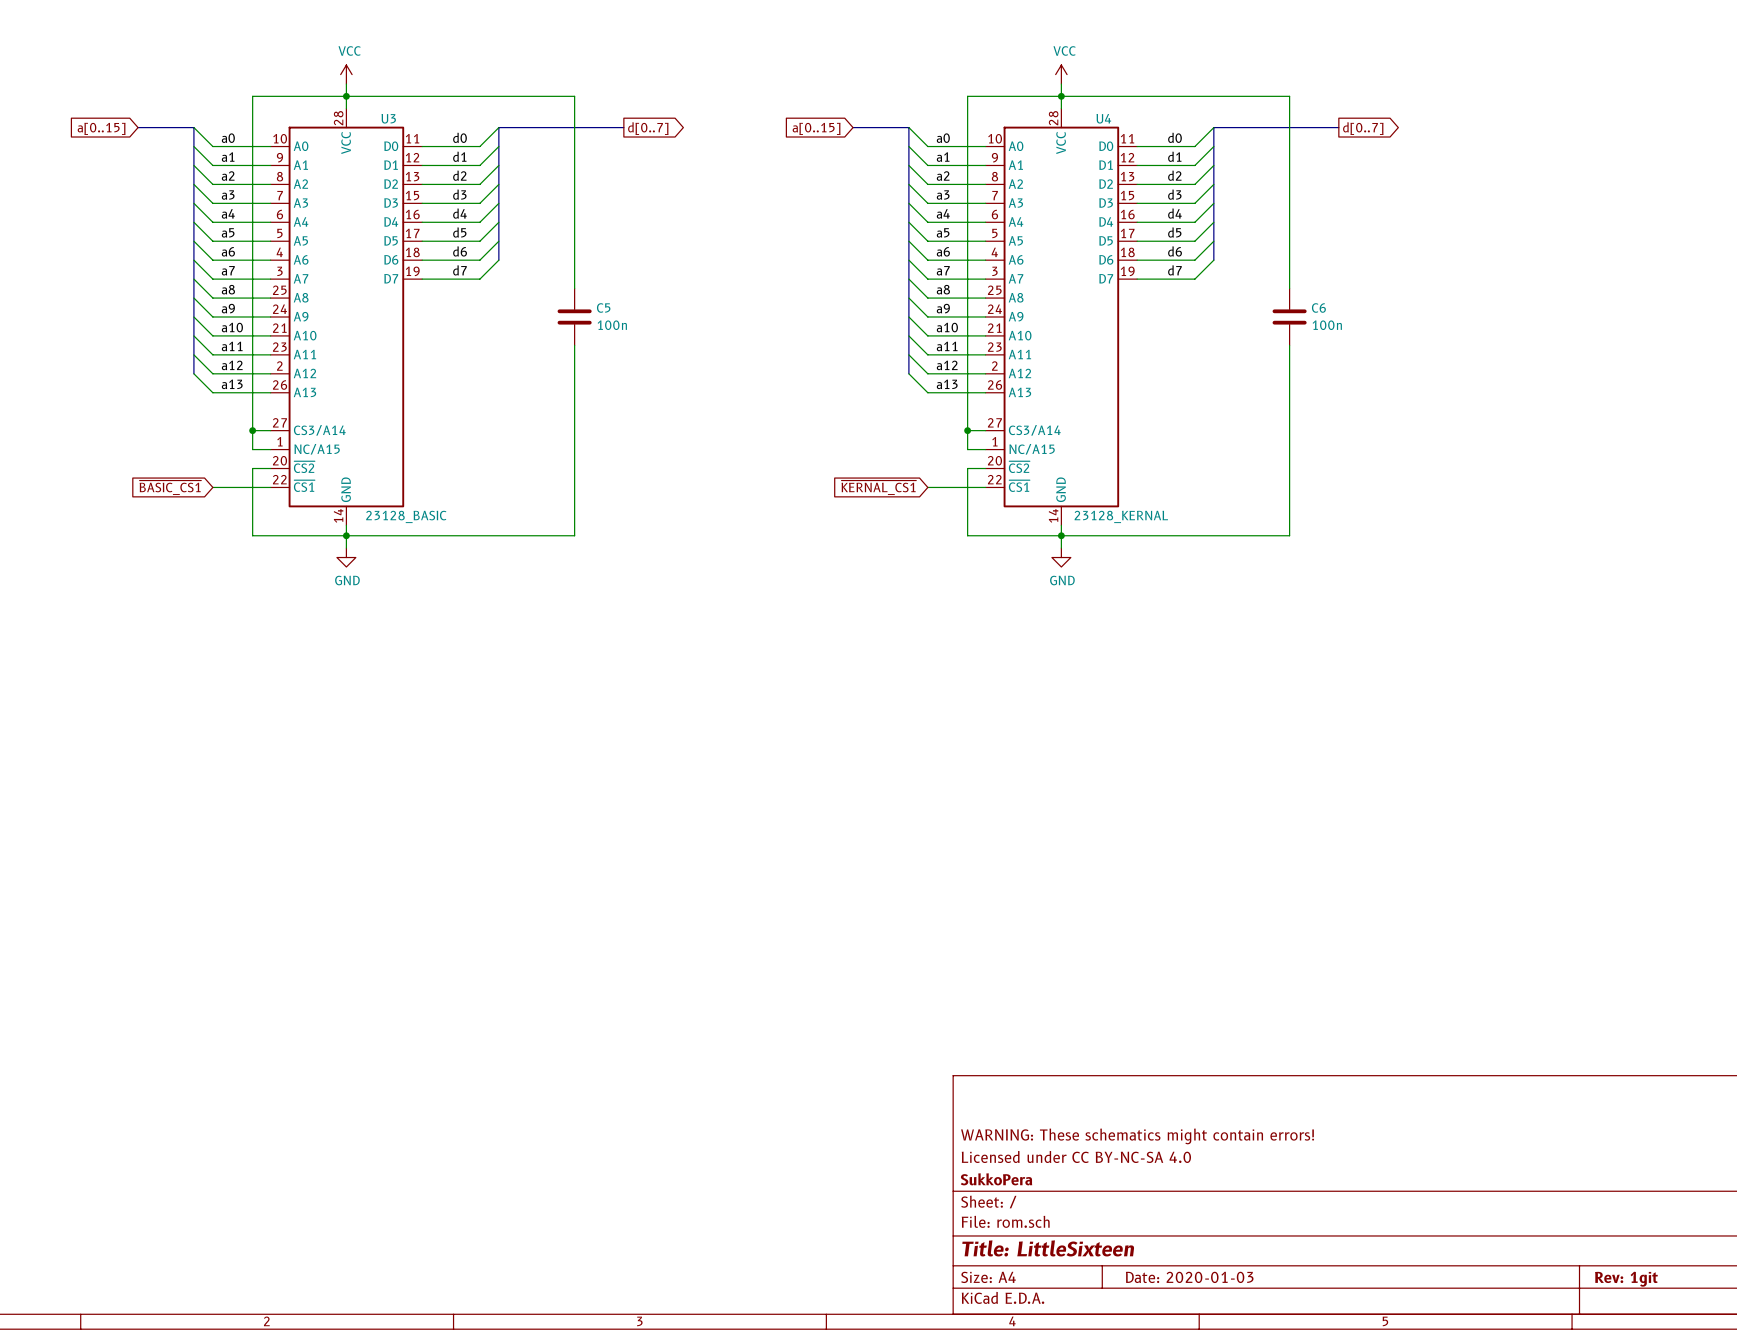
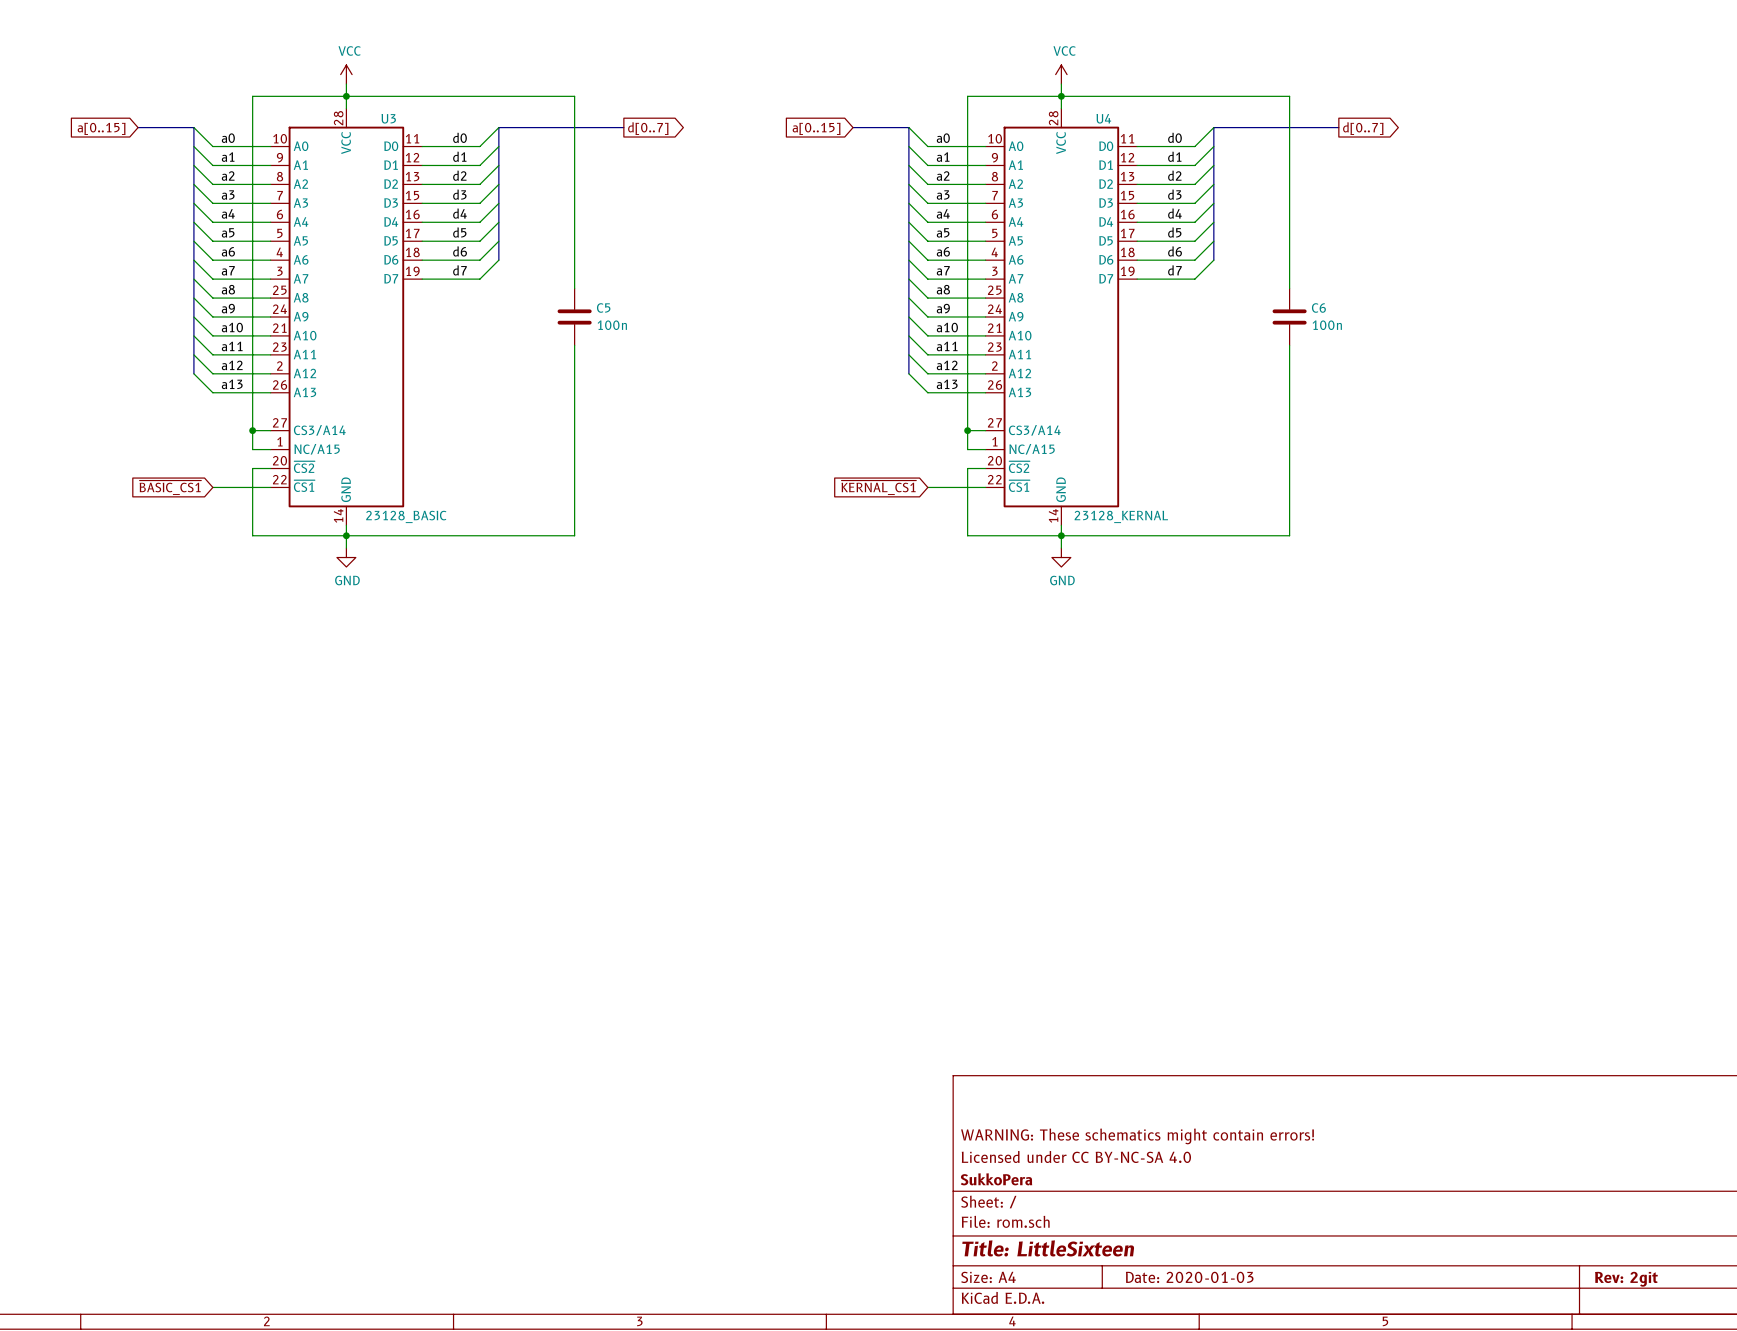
title block: Rev: 1git (1626, 1279) -> Rev: 2git (1626, 1279)

